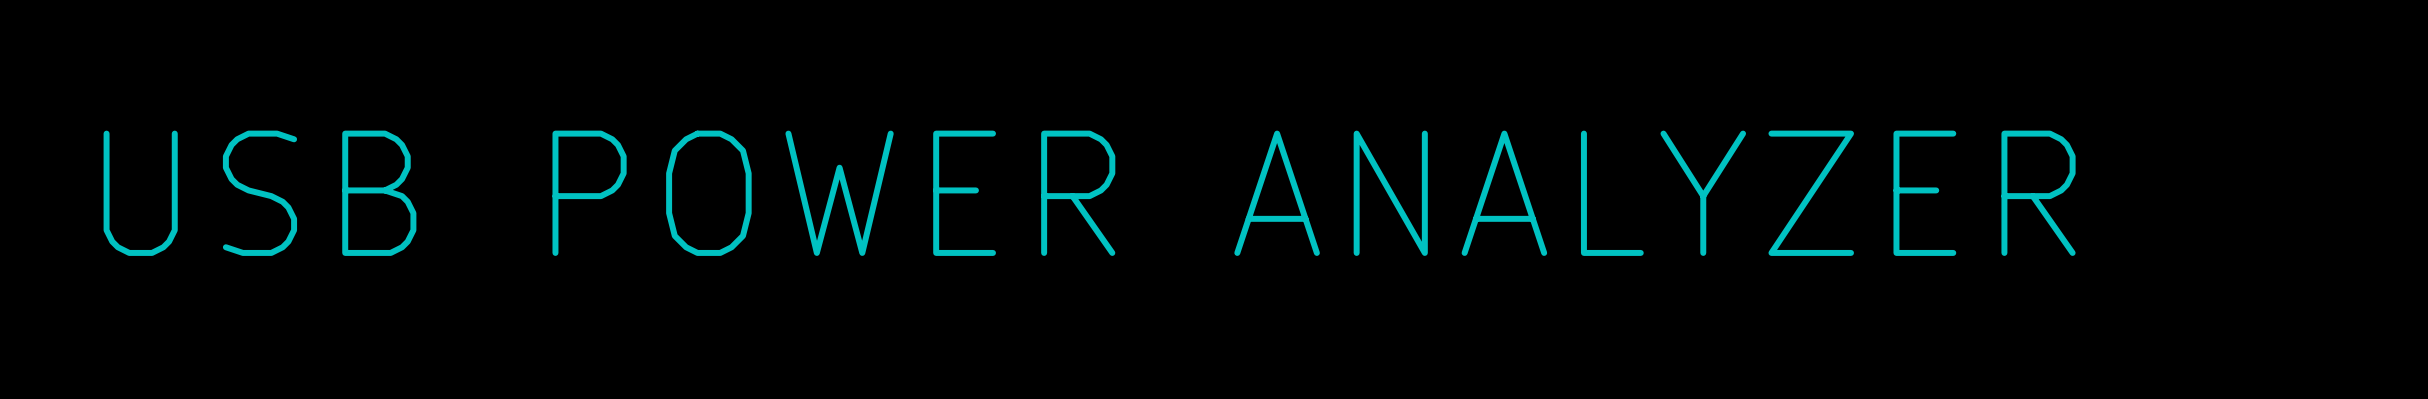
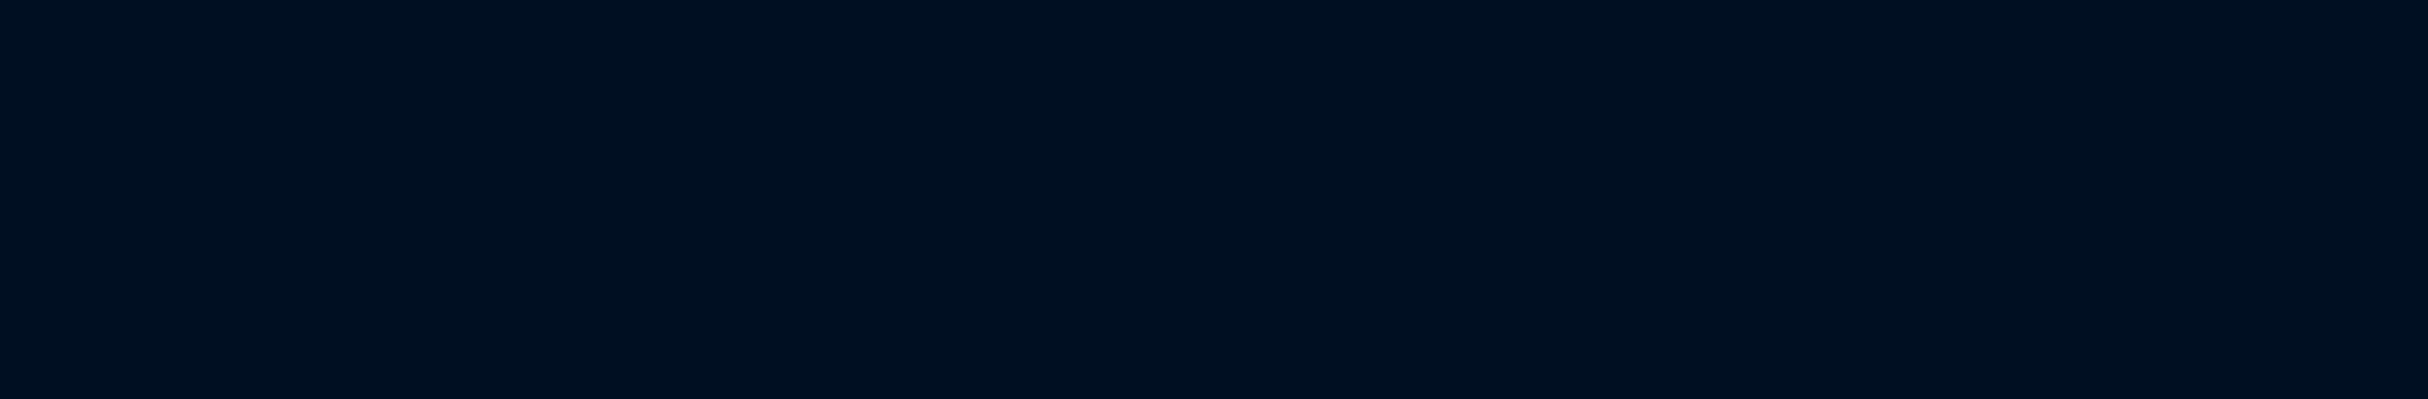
text: USB POWER ANALYZER (1089, 193) -> none

